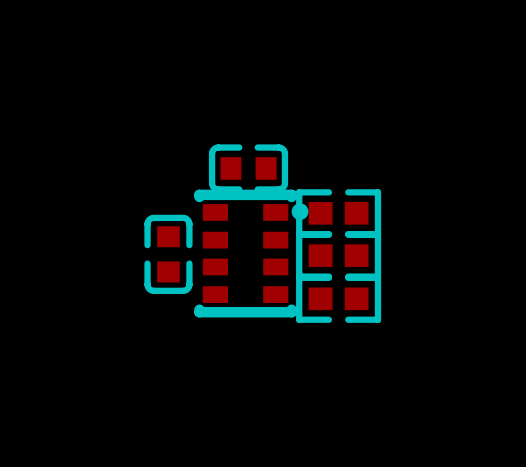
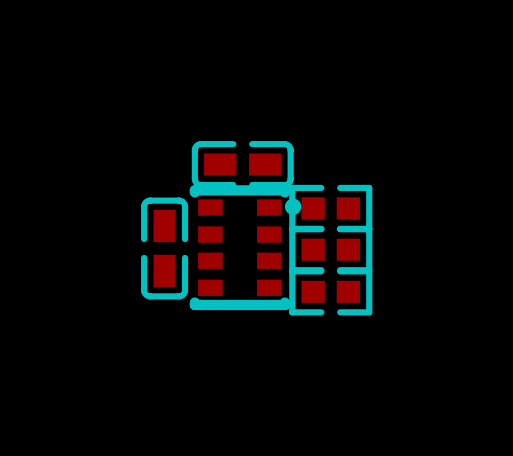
part footprint: [208, 144, 289, 193] -> [191, 141, 294, 189]
part footprint: [144, 214, 193, 294] -> [141, 197, 189, 300]

